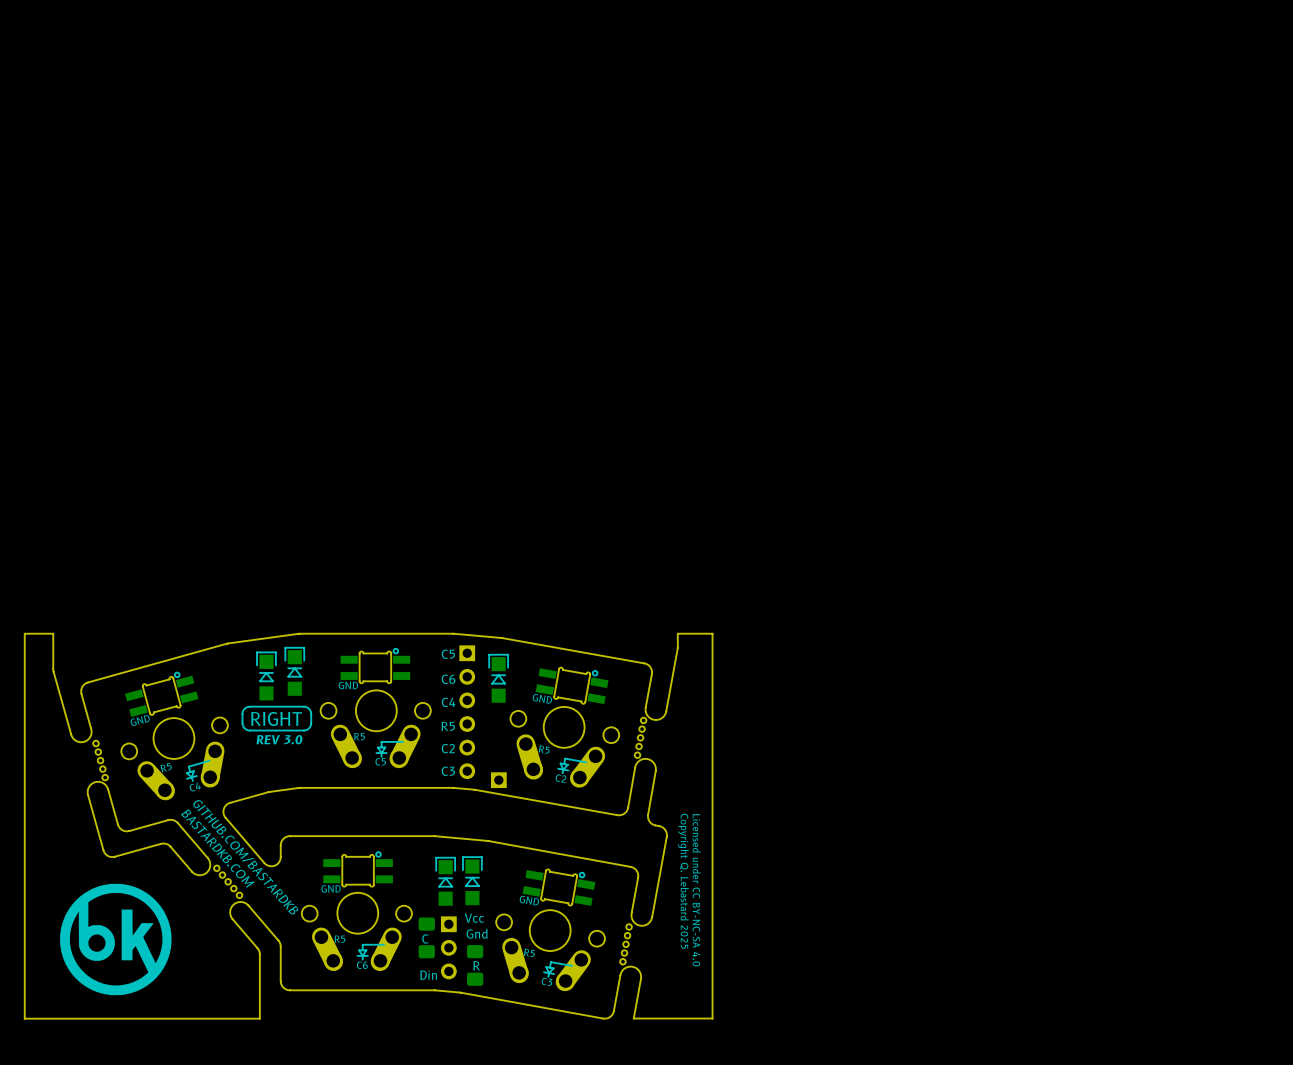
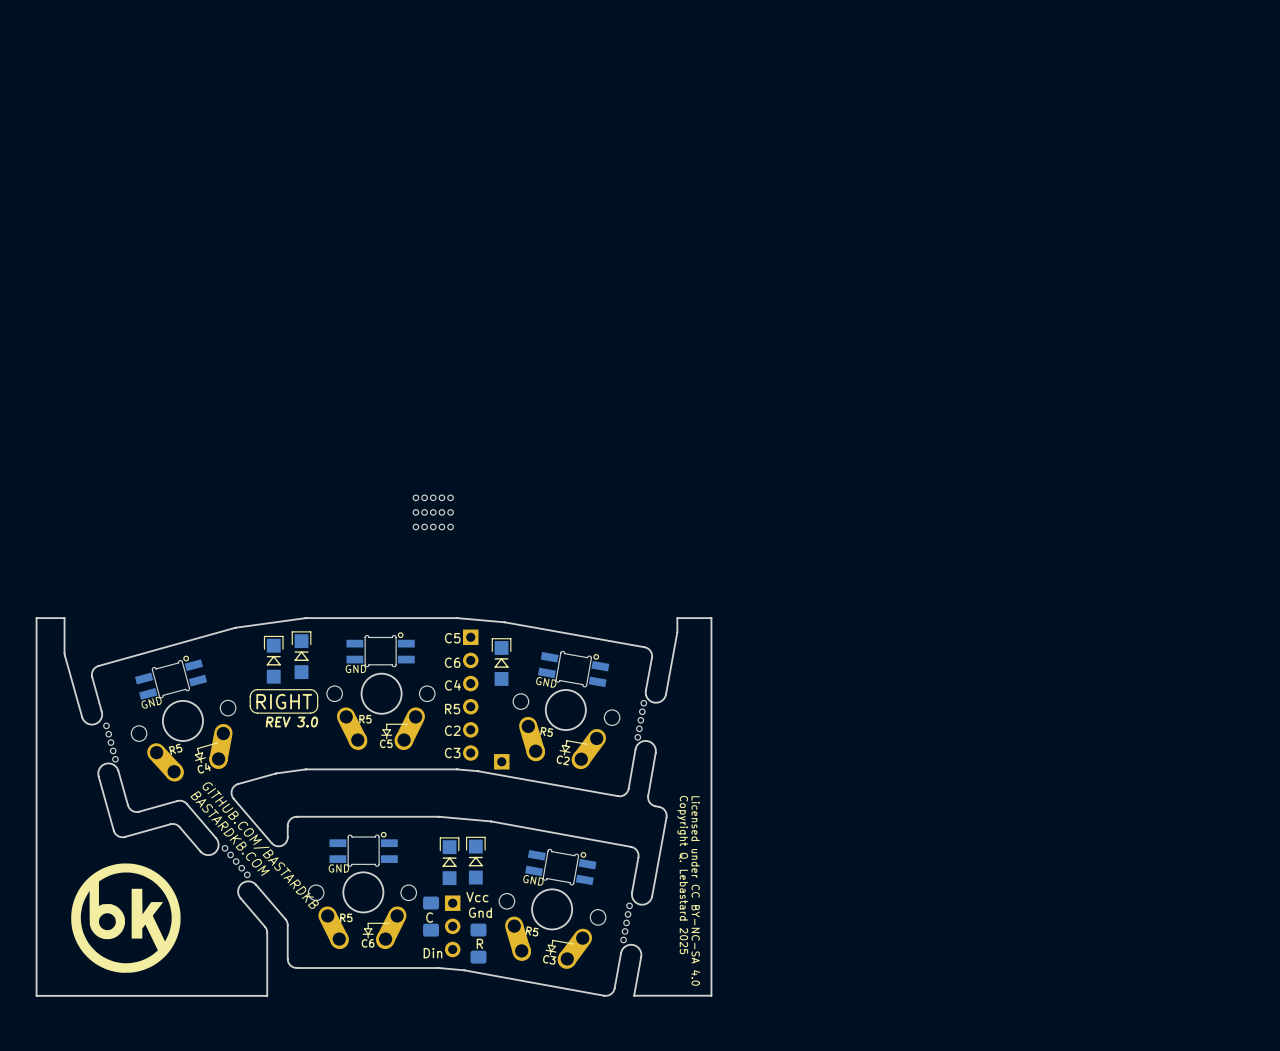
part: none -> (433, 497)
part: none -> (433, 512)
part: none -> (433, 527)

